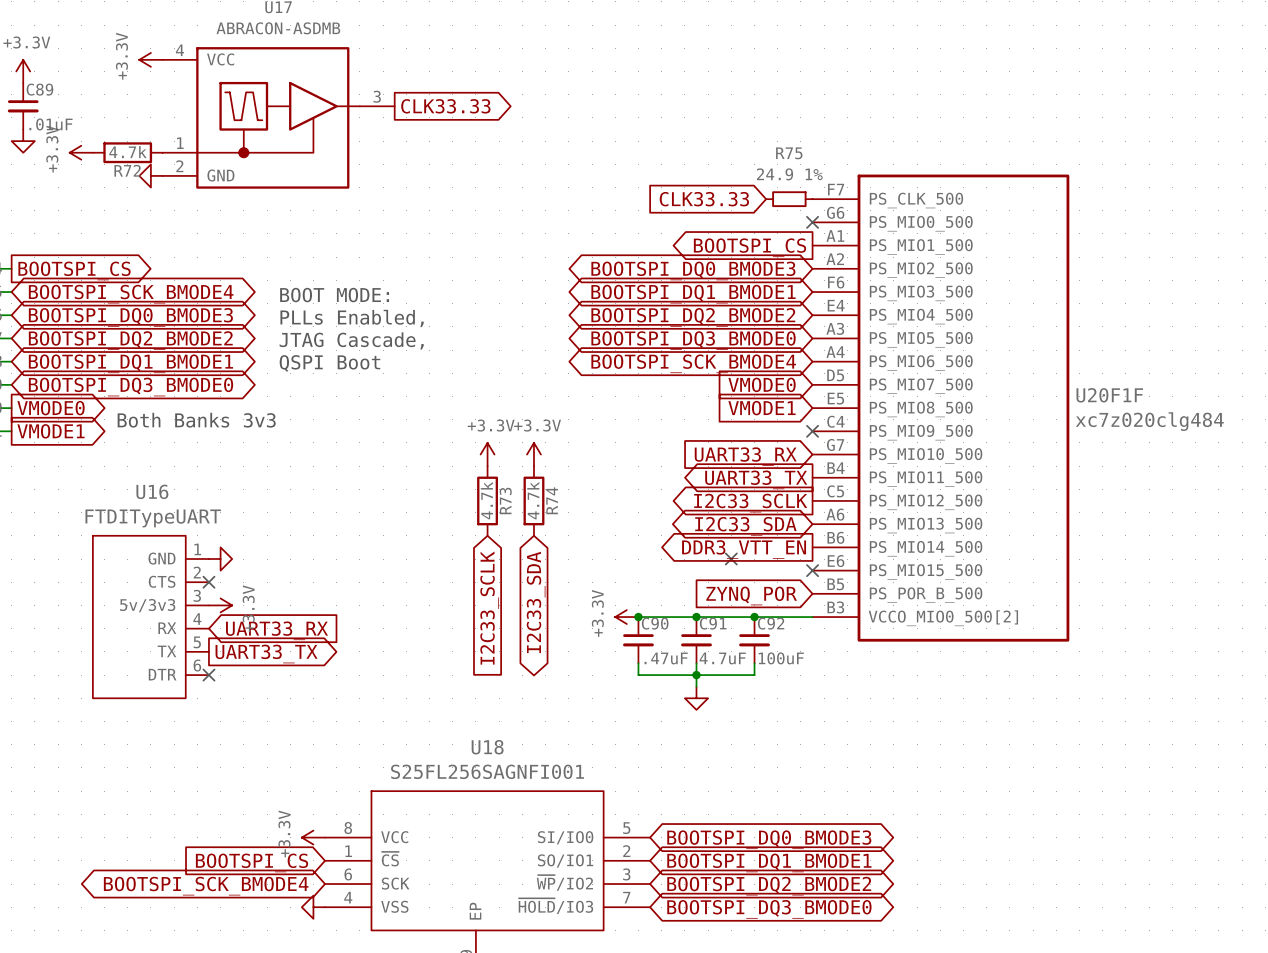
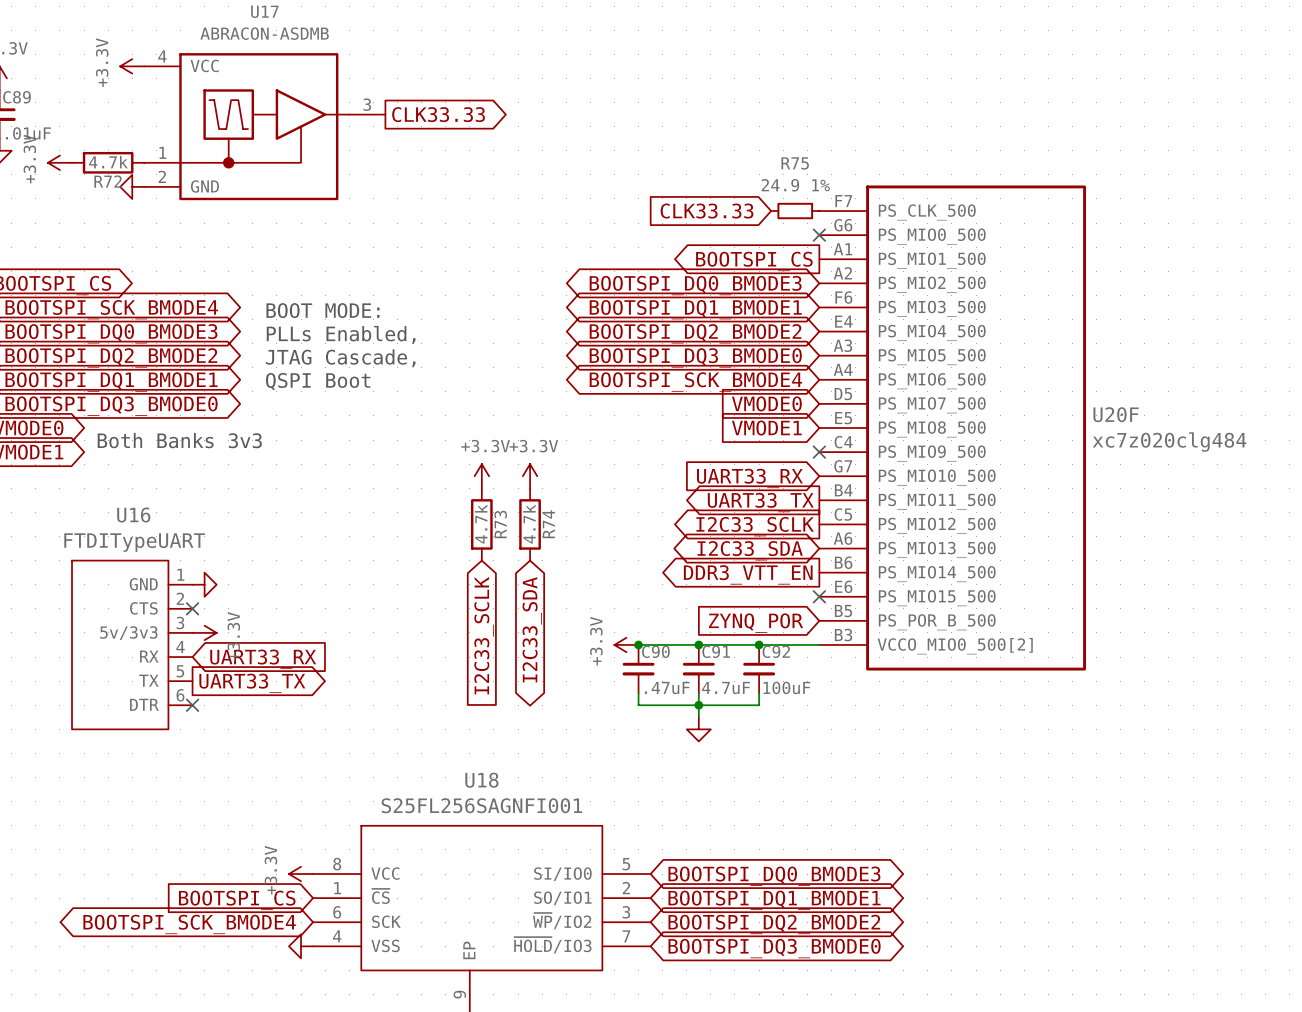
U20F1F name: U20F1F (1109, 395) -> U20F (1116, 414)
no-connect mark: (731, 559) -> none

